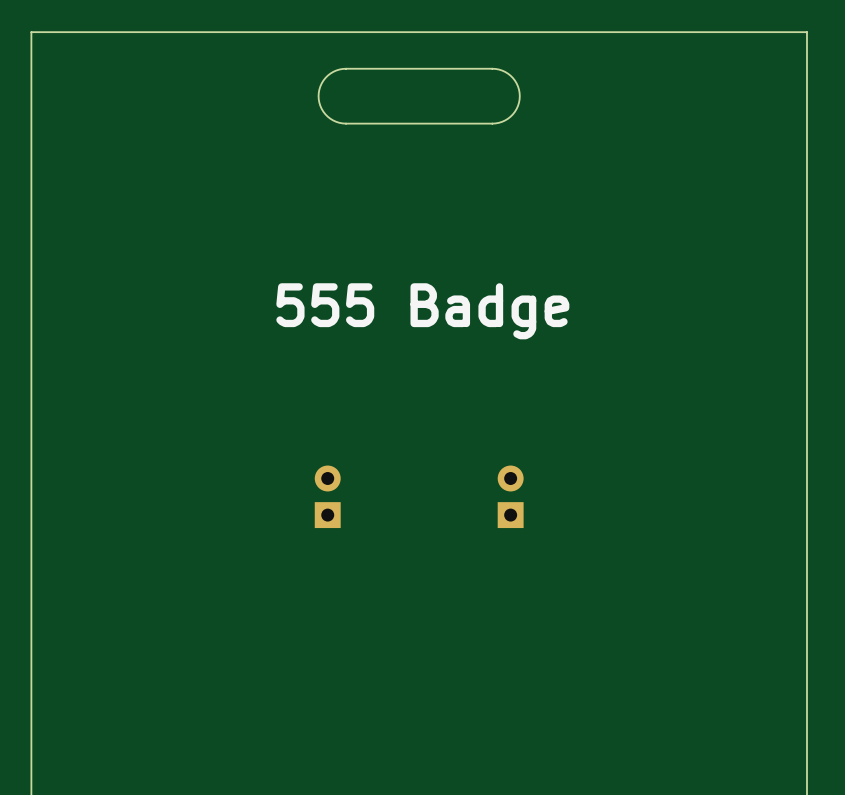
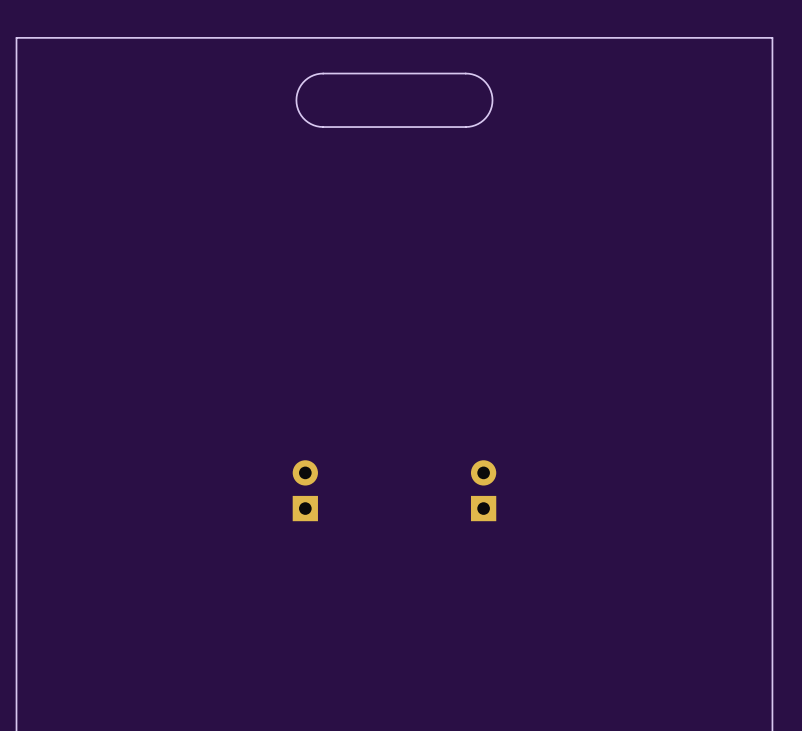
text: 555 Badge (422, 311) -> none

